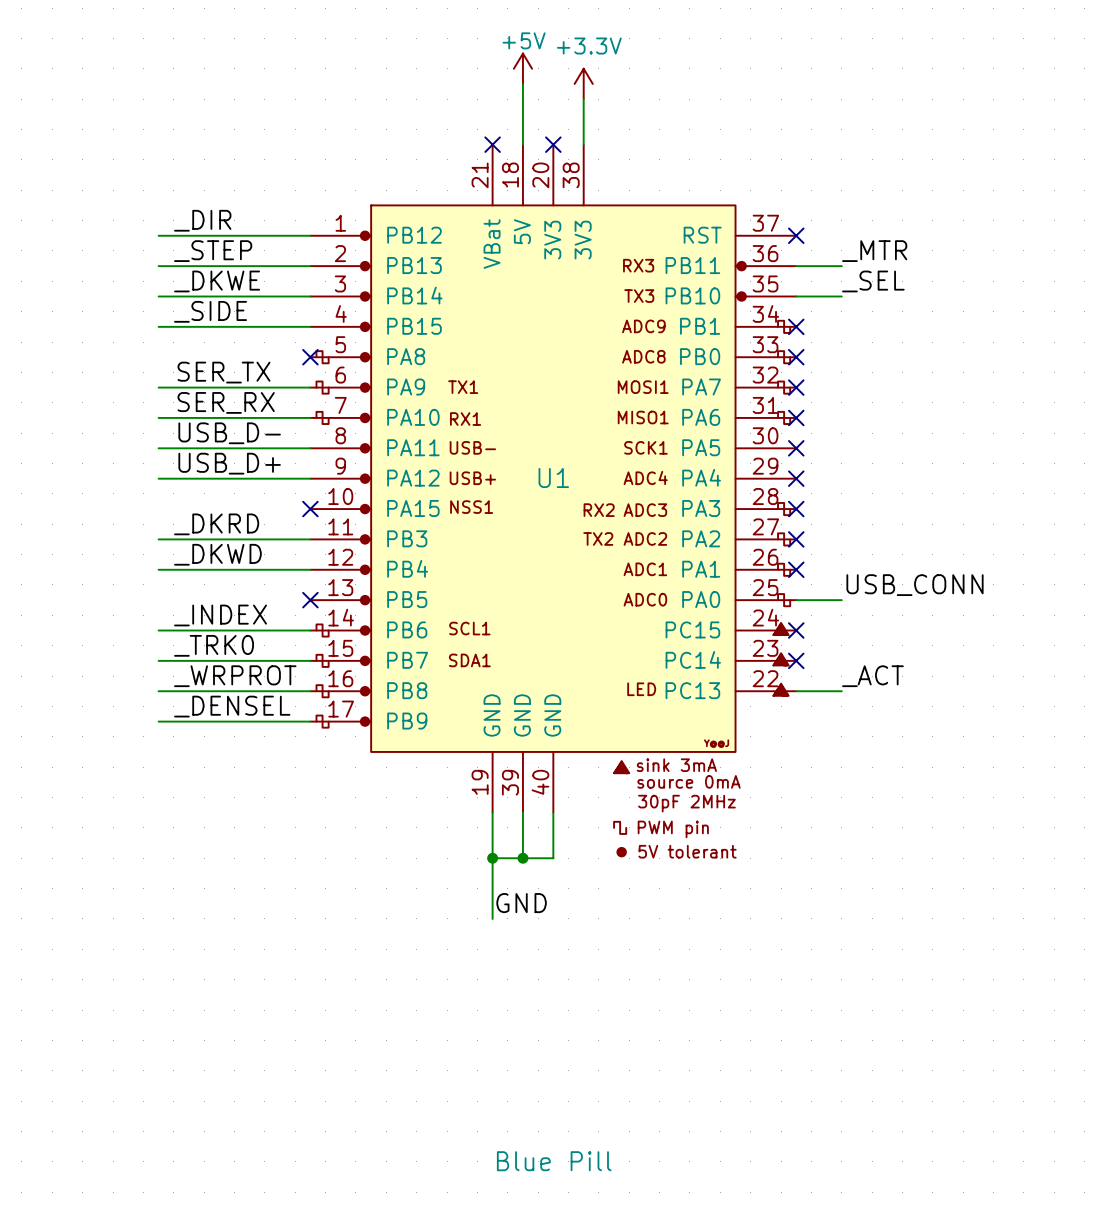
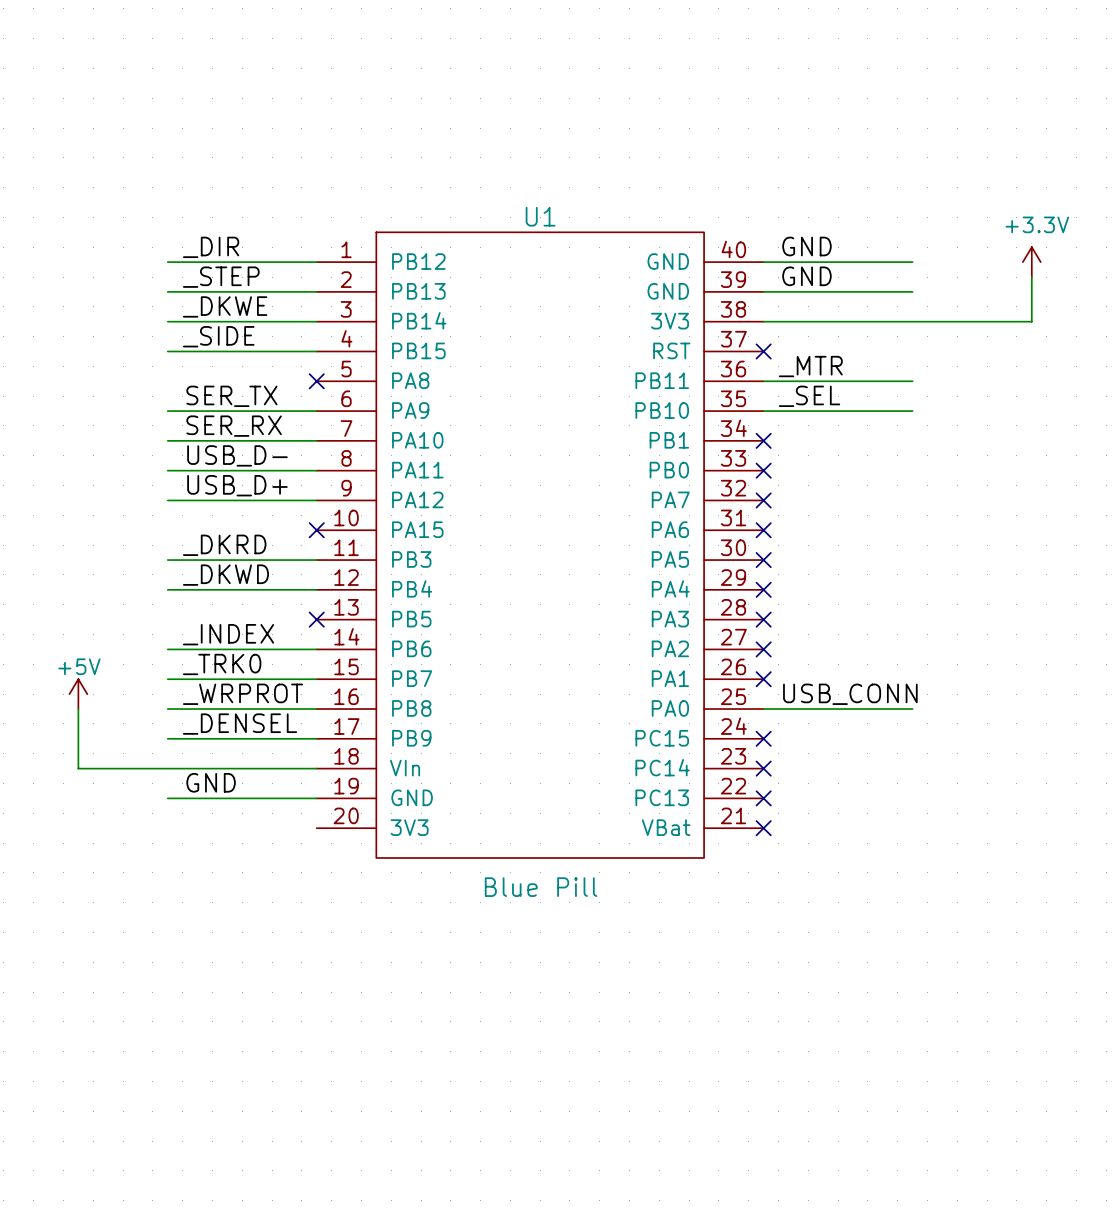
power symbol: +5V (522, 68) -> none
wire: (522, 83) (522, 144) -> none
power symbol: +3.3V (583, 83) -> none
wire: (583, 99) (583, 144) -> none
U1 symbol: [310, 144, 797, 857] -> [316, 232, 764, 858]
no-connect mark: (492, 144) -> none
no-connect mark: (553, 144) -> none
label: none -> GND (806, 246)
wire: none -> (763, 262) (912, 262)
no-connect mark: (796, 235) -> none
power symbol: none -> +3.3V (1031, 262)
label: none -> GND (806, 276)
wire: none -> (1031, 277) (1031, 321) (838, 321)
label position: _MTR (874, 251) -> _MTR (810, 366)
wire: none -> (838, 291) (912, 291)
label position: _SEL (873, 281) -> _SEL (809, 396)
no-connect mark: none -> (763, 351)
no-connect mark: (796, 326) -> none
wire: none -> (763, 381) (912, 381)
no-connect mark: (796, 357) -> none
wire: none -> (763, 411) (912, 411)
no-connect mark: (796, 387) -> none
no-connect mark: none -> (763, 440)
no-connect mark: (796, 417) -> none
no-connect mark: none -> (763, 470)
no-connect mark: (796, 448) -> none
U1 name position: U1 (553, 478) -> U1 (540, 216)
no-connect mark: none -> (763, 500)
no-connect mark: (796, 478) -> none
no-connect mark: none -> (763, 530)
no-connect mark: (796, 509) -> none
no-connect mark: none -> (763, 560)
no-connect mark: (796, 539) -> none
no-connect mark: none -> (763, 589)
no-connect mark: (796, 569) -> none
label position: USB_CONN (915, 585) -> USB_CONN (850, 694)
no-connect mark: none -> (763, 619)
wire: (796, 600) (841, 600) -> none
no-connect mark: none -> (763, 649)
no-connect mark: (796, 630) -> none
no-connect mark: none -> (763, 679)
no-connect mark: (796, 660) -> none
power symbol: none -> +5V (78, 694)
label: _ACT (872, 676) -> none
wire: none -> (78, 709) (78, 768) (316, 768)
wire: none -> (838, 709) (912, 709)
no-connect mark: none -> (763, 738)
no-connect mark: none -> (763, 768)
label: none -> GND (211, 782)
wire: none -> (167, 798) (316, 798)
no-connect mark: none -> (763, 798)
wire: (492, 812) (492, 918) -> none
wire: (522, 812) (522, 858) -> none
wire: (553, 812) (553, 858) (492, 858) -> none
no-connect mark: none -> (763, 828)
junction: (492, 858) -> none
junction: (522, 858) -> none
label: GND (521, 903) -> none
U1 value position: Blue Pill (554, 1161) -> Blue Pill (541, 887)

